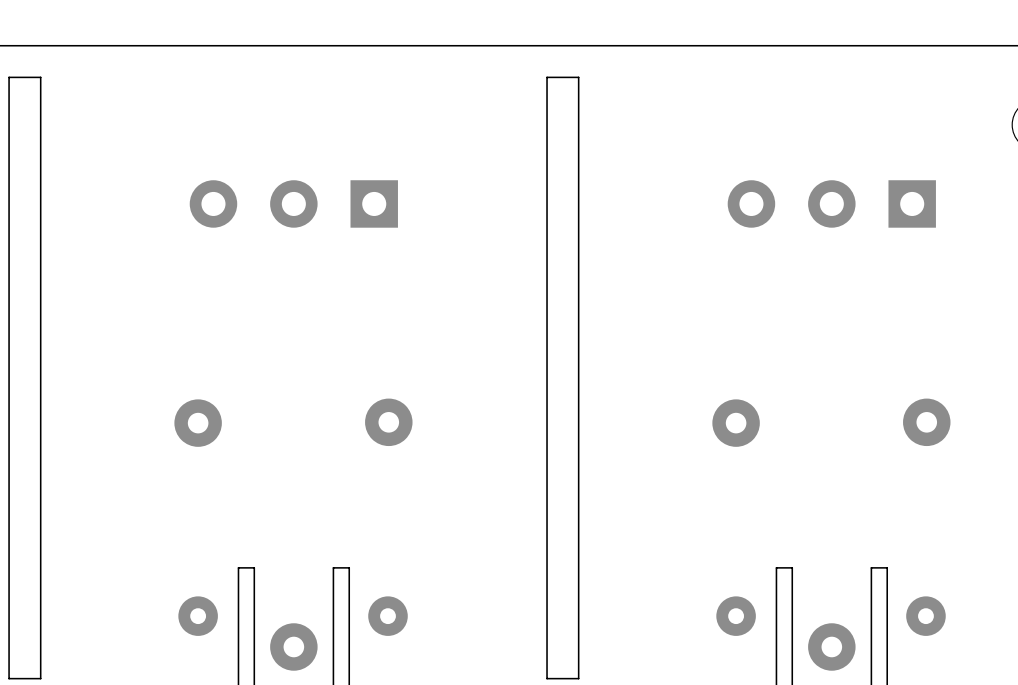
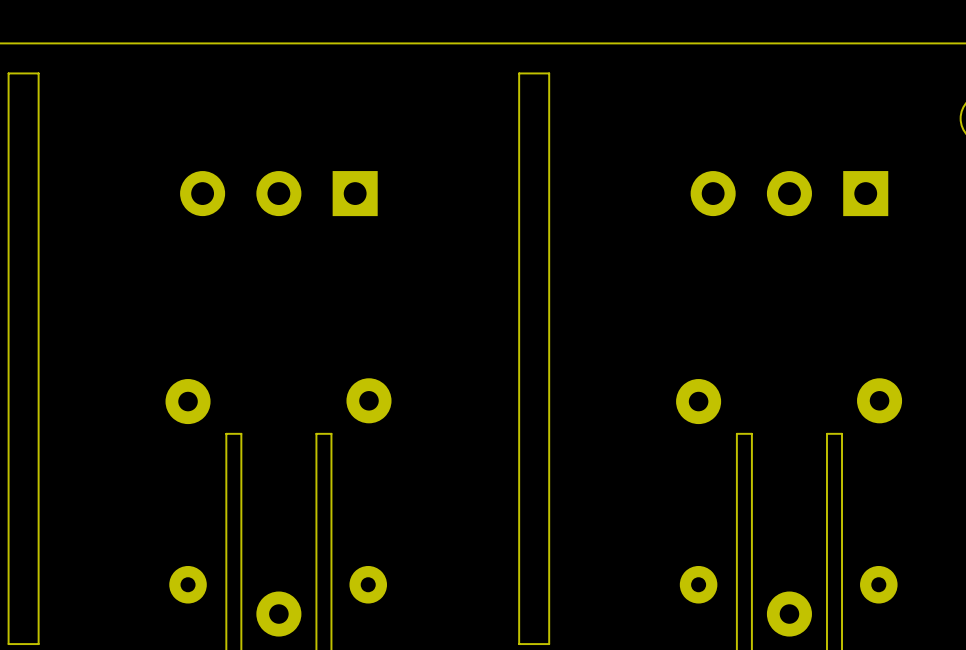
board edge: (254, 567) (238, 567) -> (241, 538) (241, 433) (226, 433) (226, 538)
board edge: (349, 567) (333, 567) -> (331, 538) (331, 433) (316, 433) (316, 538)
board edge: (792, 567) (776, 567) -> (751, 538) (751, 433) (736, 433) (736, 538)
board edge: (887, 567) (871, 567) -> (842, 538) (842, 433) (826, 433) (826, 538)

